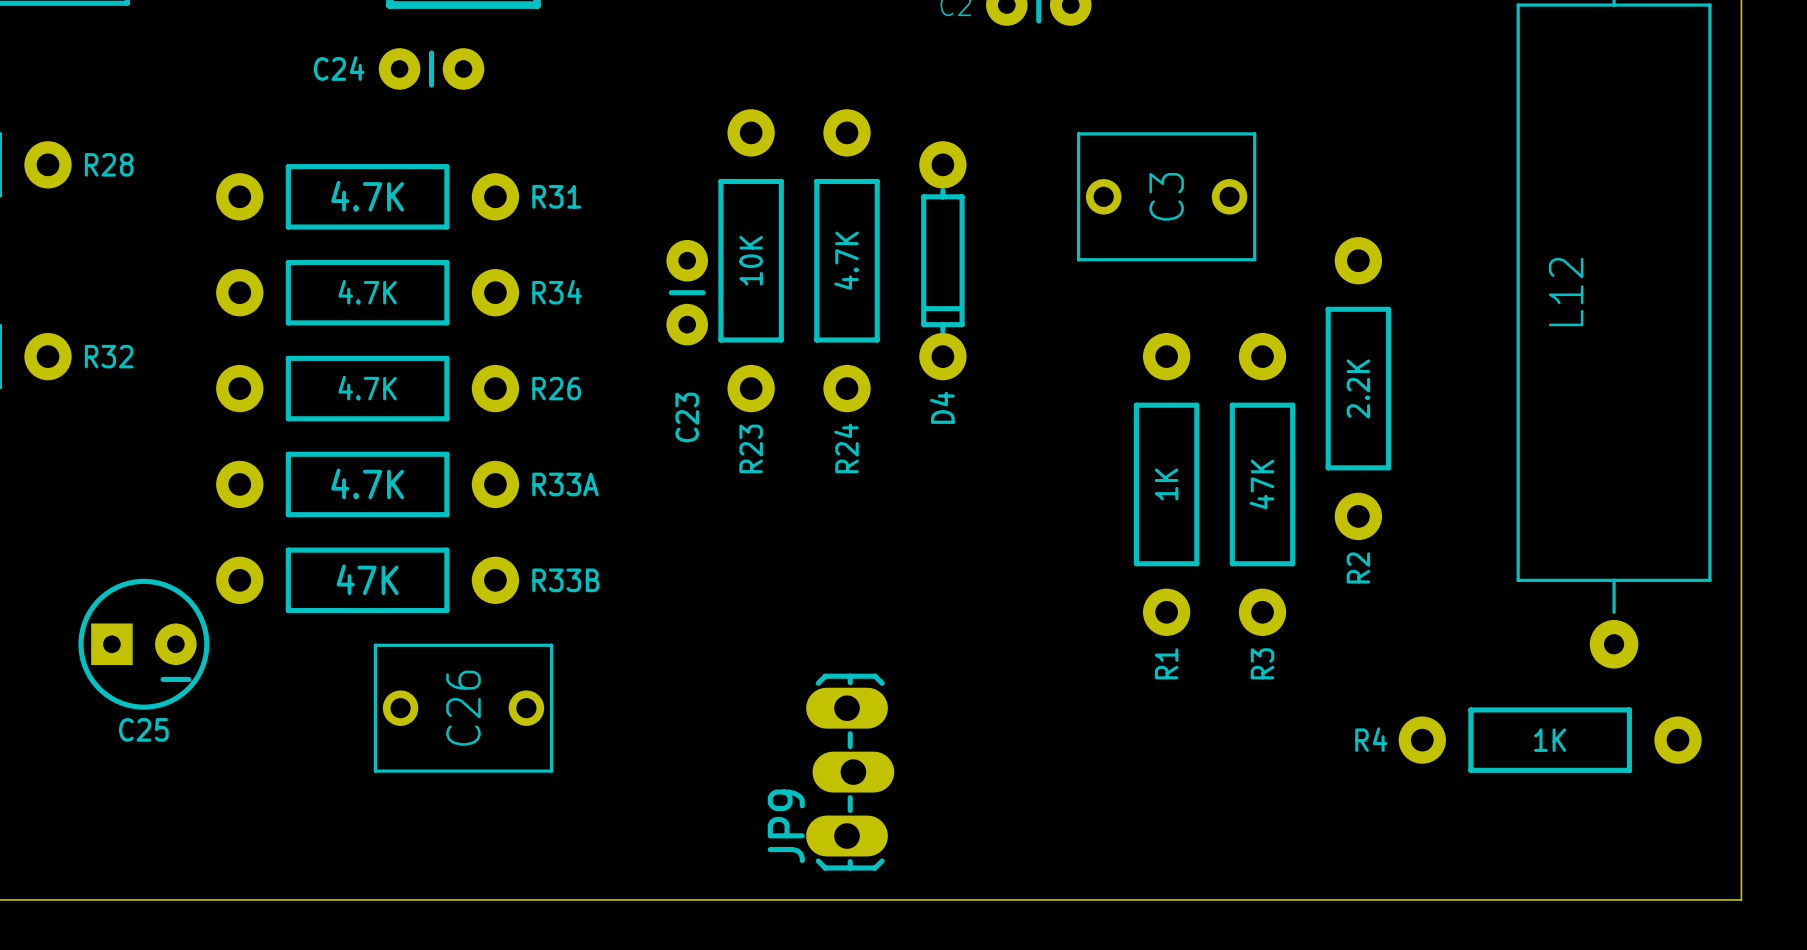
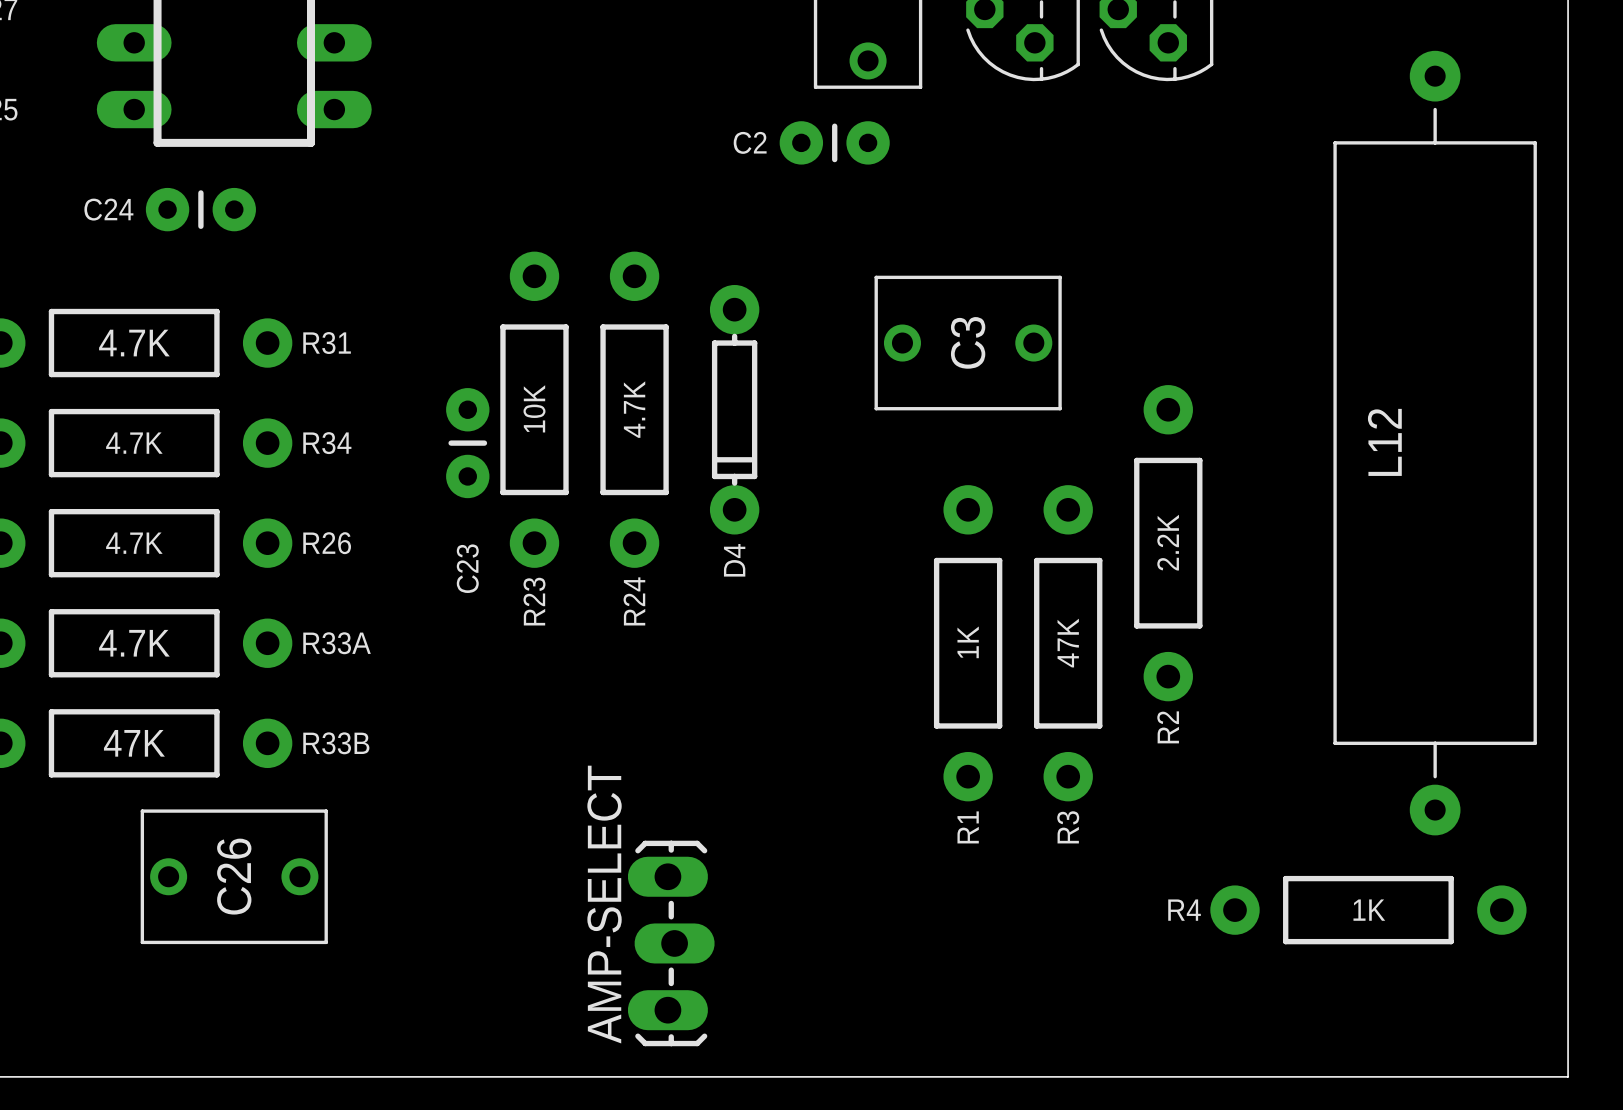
JP9: (850, 772) -> none
AMP-SELECT: none -> (671, 943)

